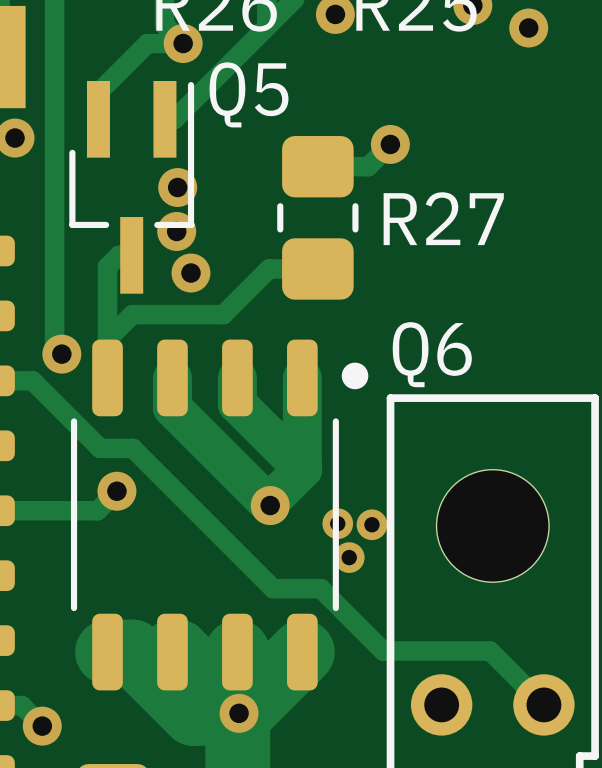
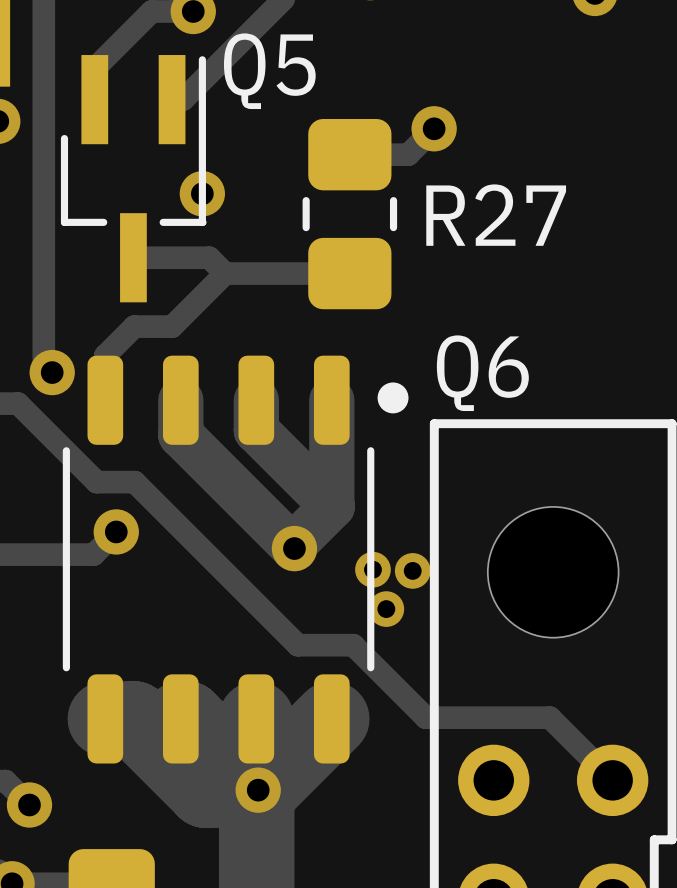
via: (177, 187) -> none
via: none -> (202, 193)
via: (176, 231) -> none
track: (131, 255) (119, 255) (107, 266) (107, 339) -> (133, 257) (209, 257) (225, 273)
track: none -> (225, 273) (293, 273)
track: (269, 268) (223, 314) (165, 314) -> (225, 273) (172, 326)
via: (190, 273) -> none

